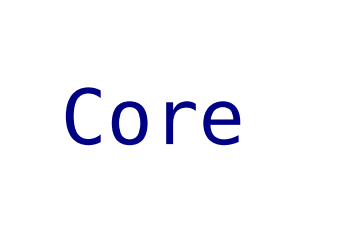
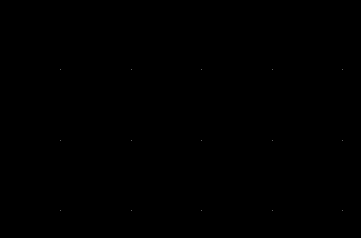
text: Core (153, 116) -> none

